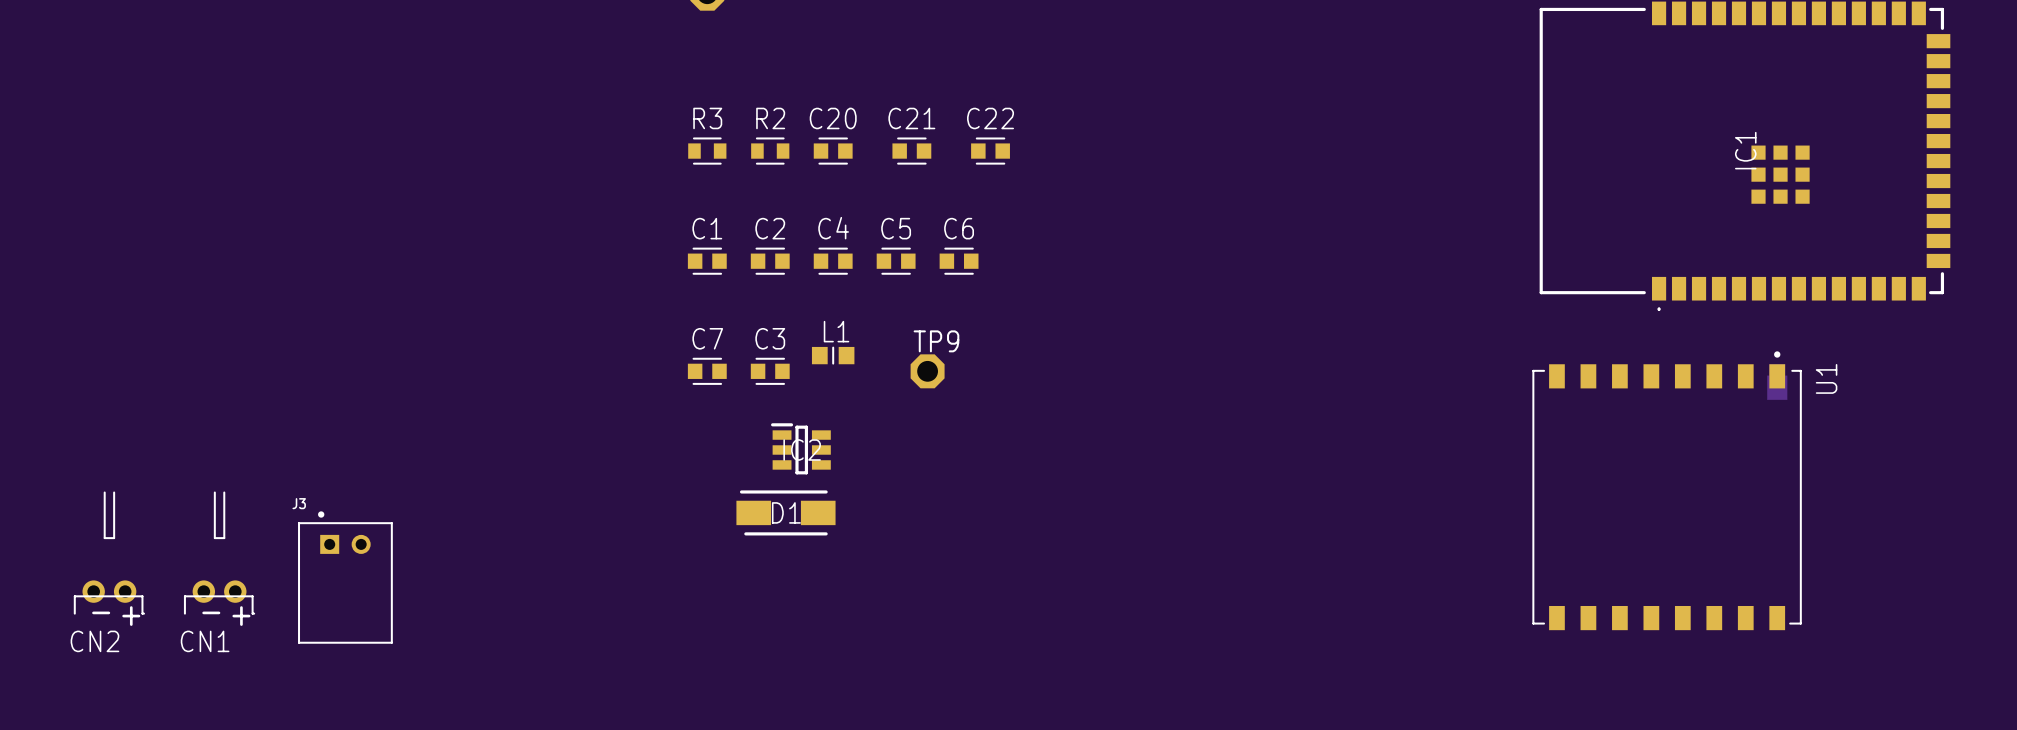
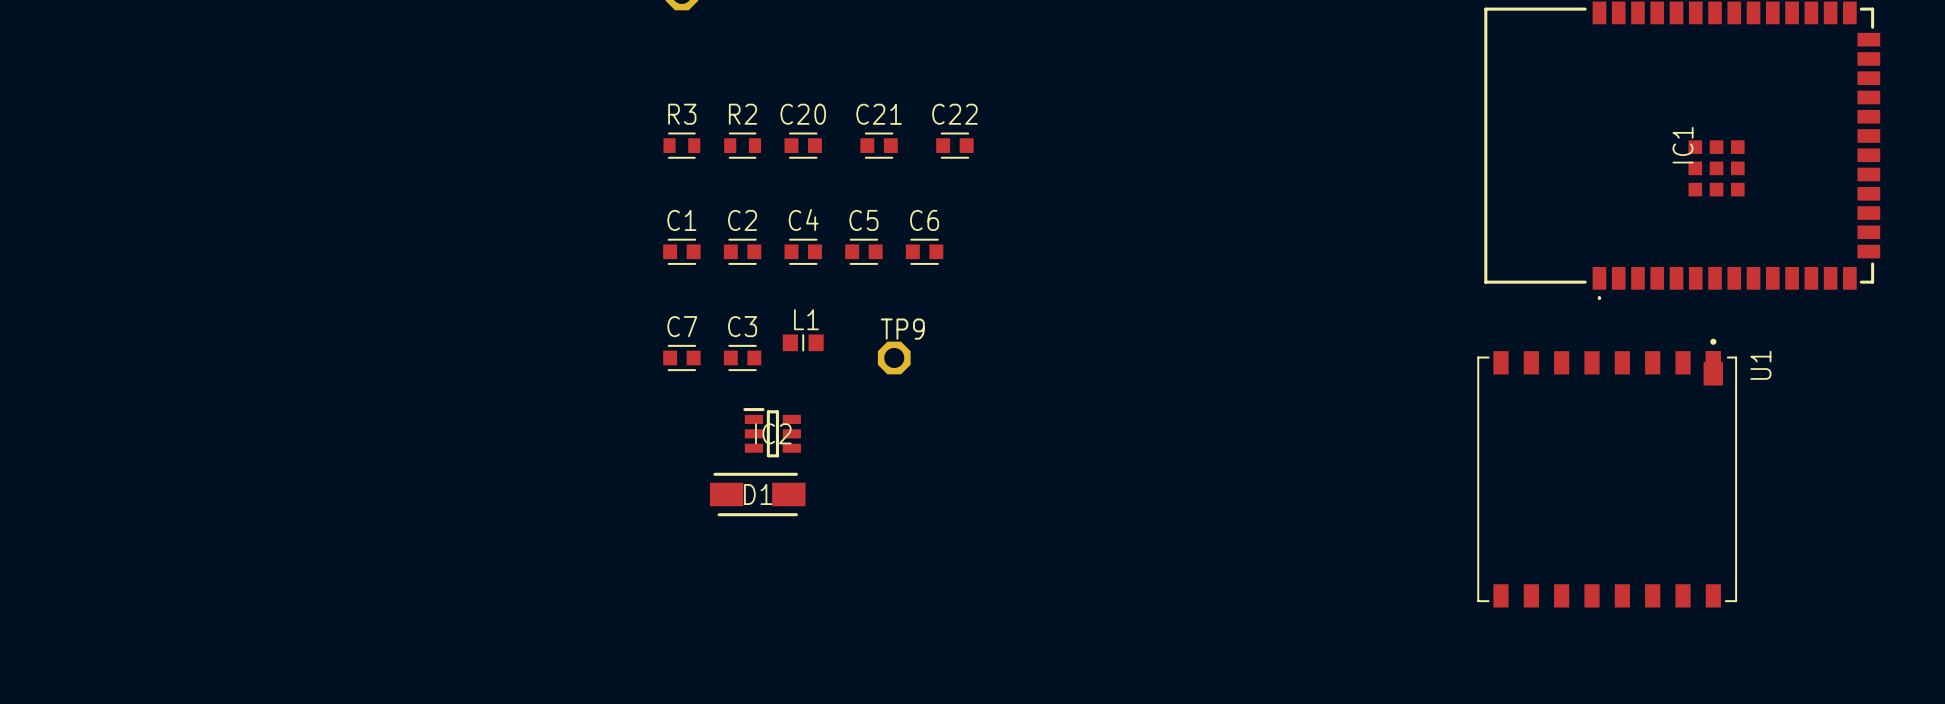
CN2: (109, 553) -> none
CN1: (219, 553) -> none
J3: (345, 577) -> none

